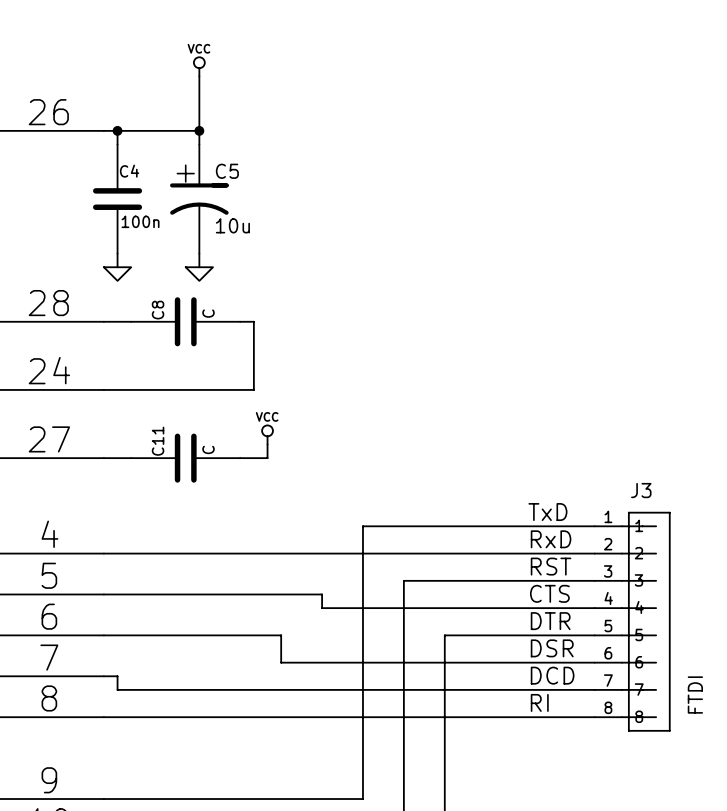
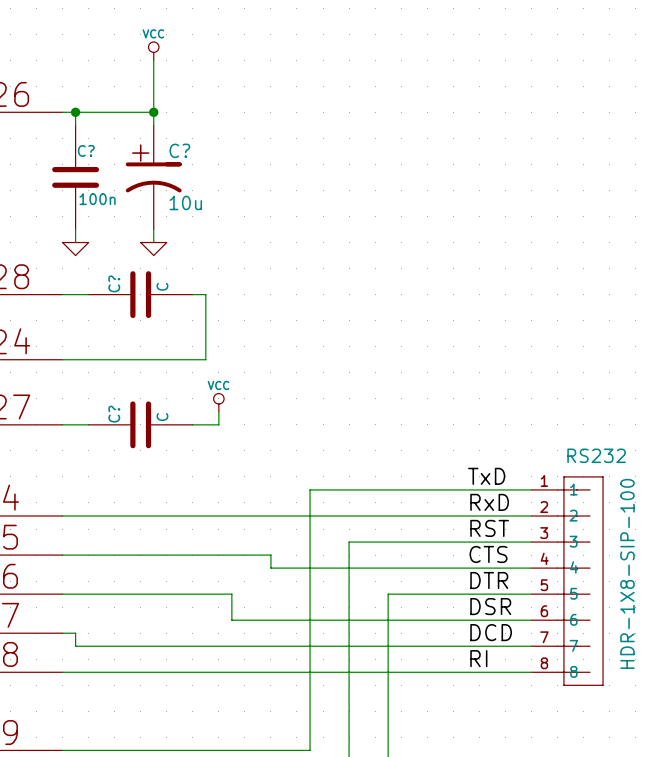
C4 name: C4 (129, 171) -> C? (86, 150)
C5 name: C5 (227, 171) -> C? (179, 150)
C8 name: C8 (158, 310) -> C? (114, 283)
C11 name: C11 (158, 441) -> C? (114, 414)
J3 name: J3 (641, 490) -> RS232 (596, 455)
J3 value: FTDI (695, 695) -> HDR-1X8-SIP-100 (627, 573)

